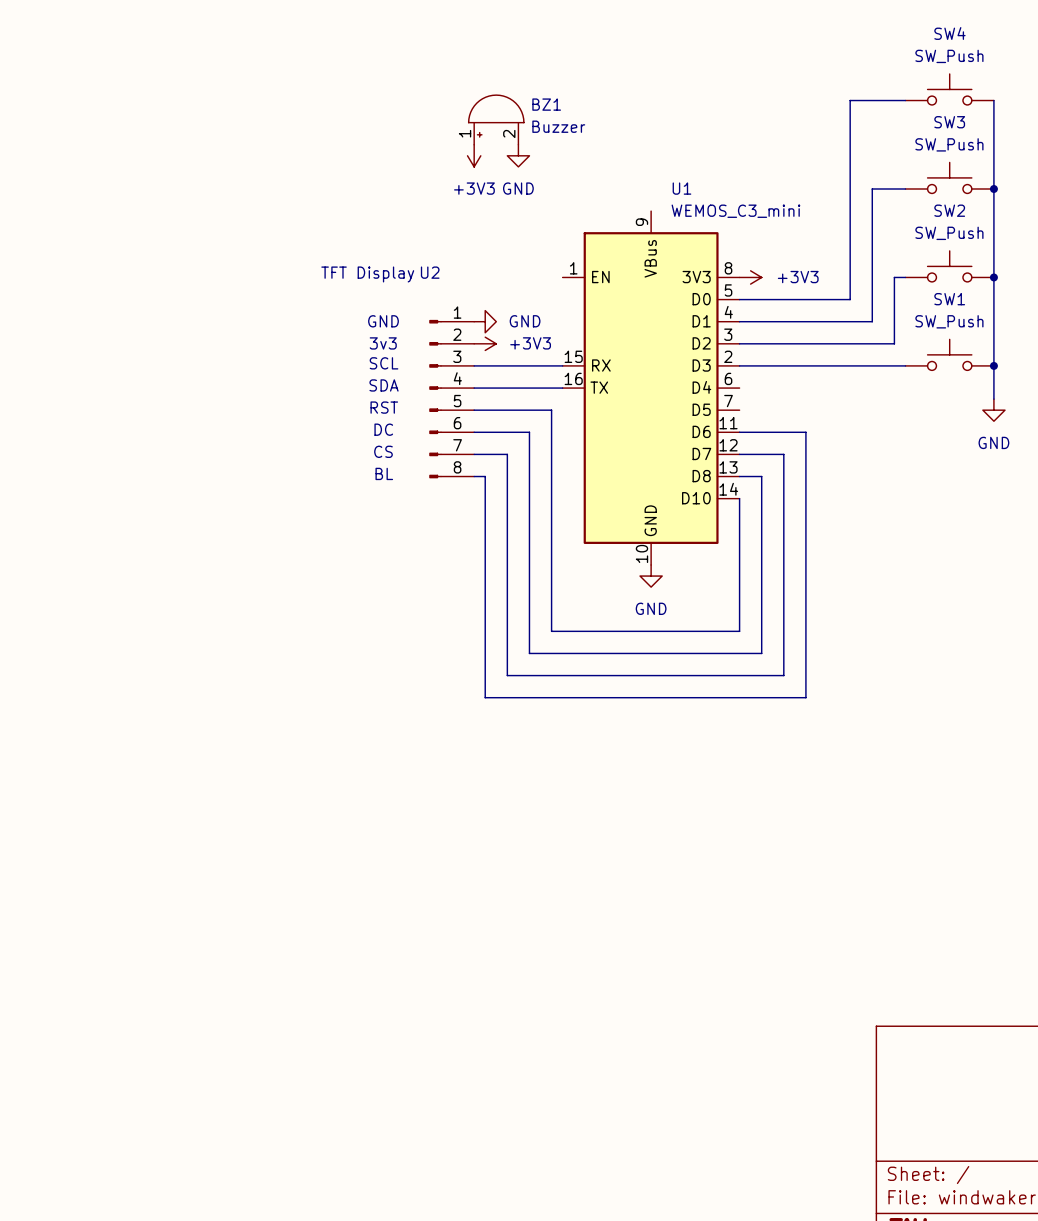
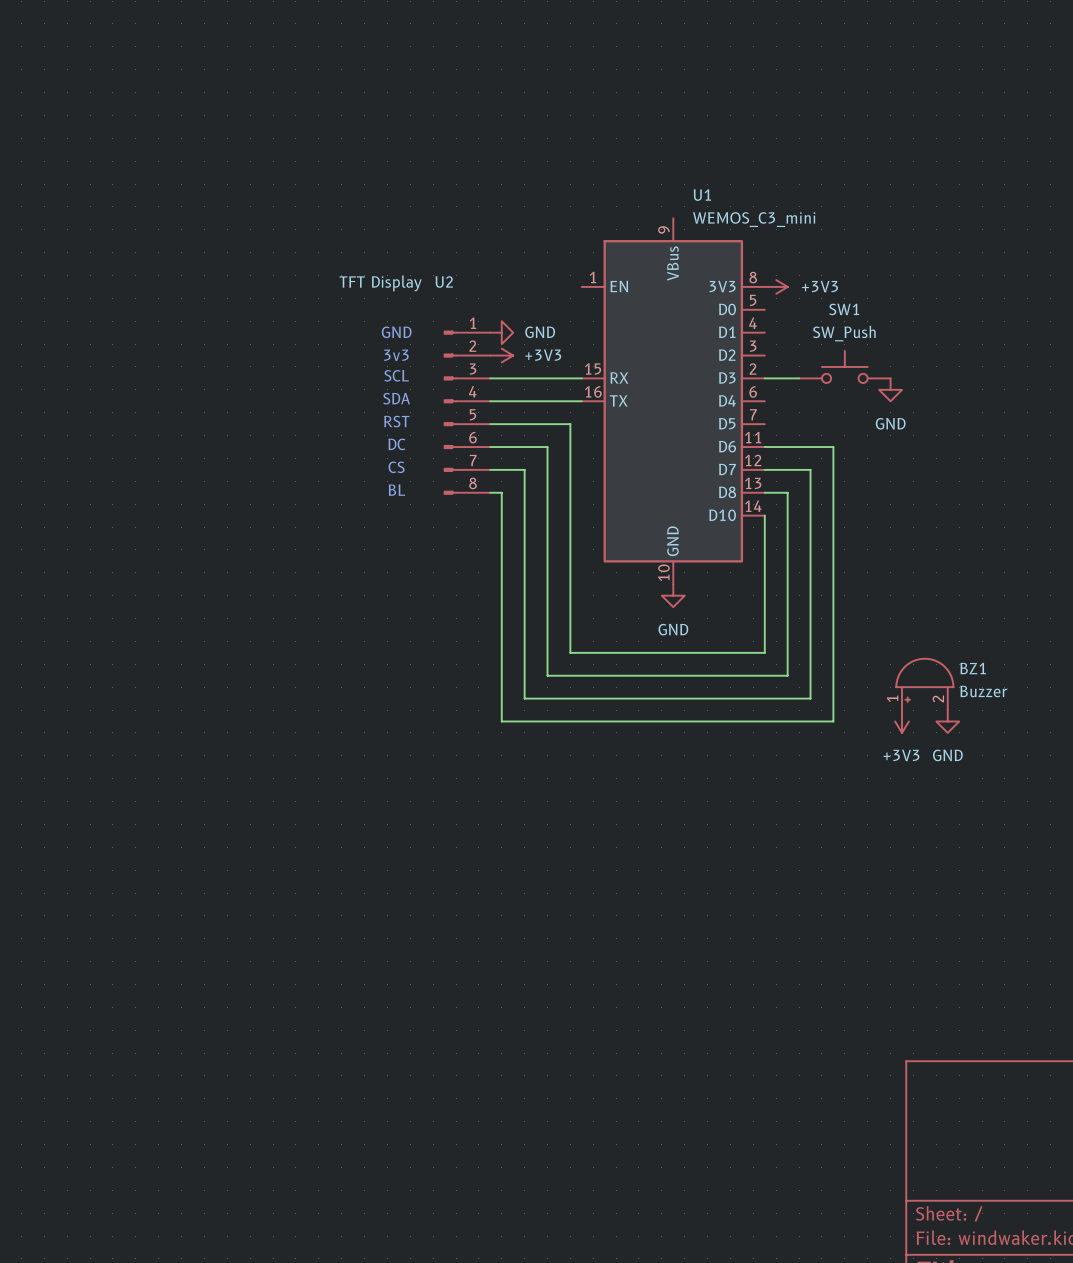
SW4: SW_Push (949, 89) -> none
wire: (905, 100) (850, 100) (850, 299) (739, 299) -> none
wire: (993, 100) (993, 399) -> none
BZ1 position: (496, 119) -> (924, 684)
power symbol: +3V3 (474, 155) -> none
power symbol: GND (518, 155) -> none
SW3: SW_Push (949, 177) -> none
wire: (905, 188) (872, 188) (872, 321) (739, 321) -> none
junction: (993, 188) -> none
SW2: SW_Push (949, 266) -> none
wire: (905, 277) (894, 277) (894, 343) (739, 343) -> none
junction: (993, 277) -> none
SW1 position: (949, 354) -> (844, 366)
wire: (772, 365) (905, 365) -> none
junction: (993, 365) -> none
power symbol position: GND (993, 410) -> GND (890, 389)
power symbol: none -> +3V3 (902, 721)
power symbol: none -> GND (947, 721)

